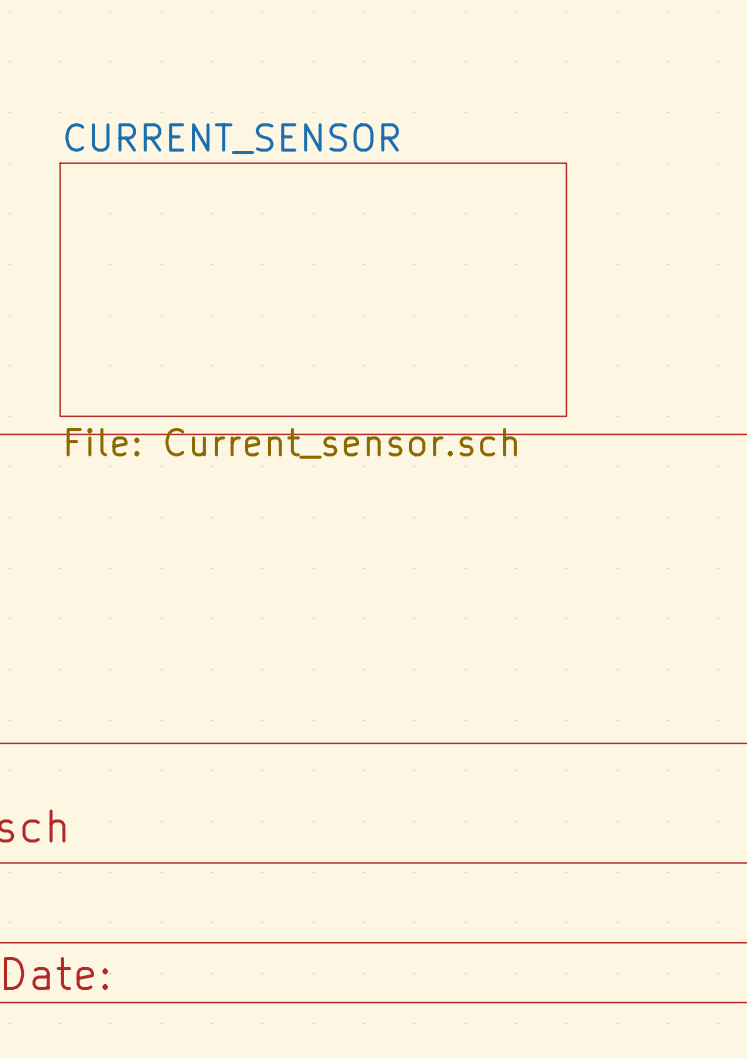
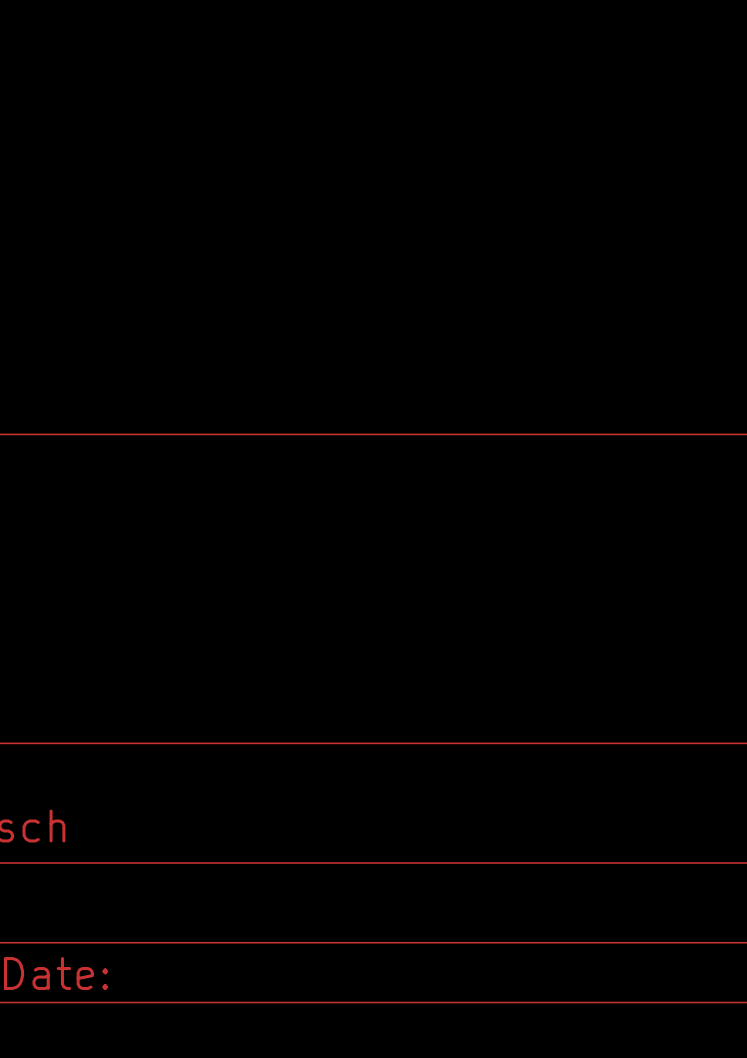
sheet CURRENT_SENSOR: File: Current_sensor.sch (313, 289) -> none

